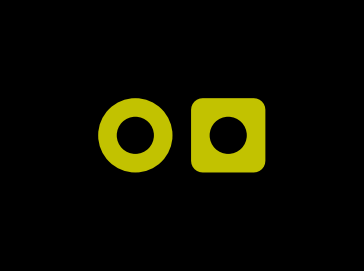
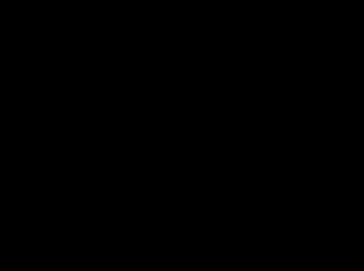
part: (181, 135) -> none

